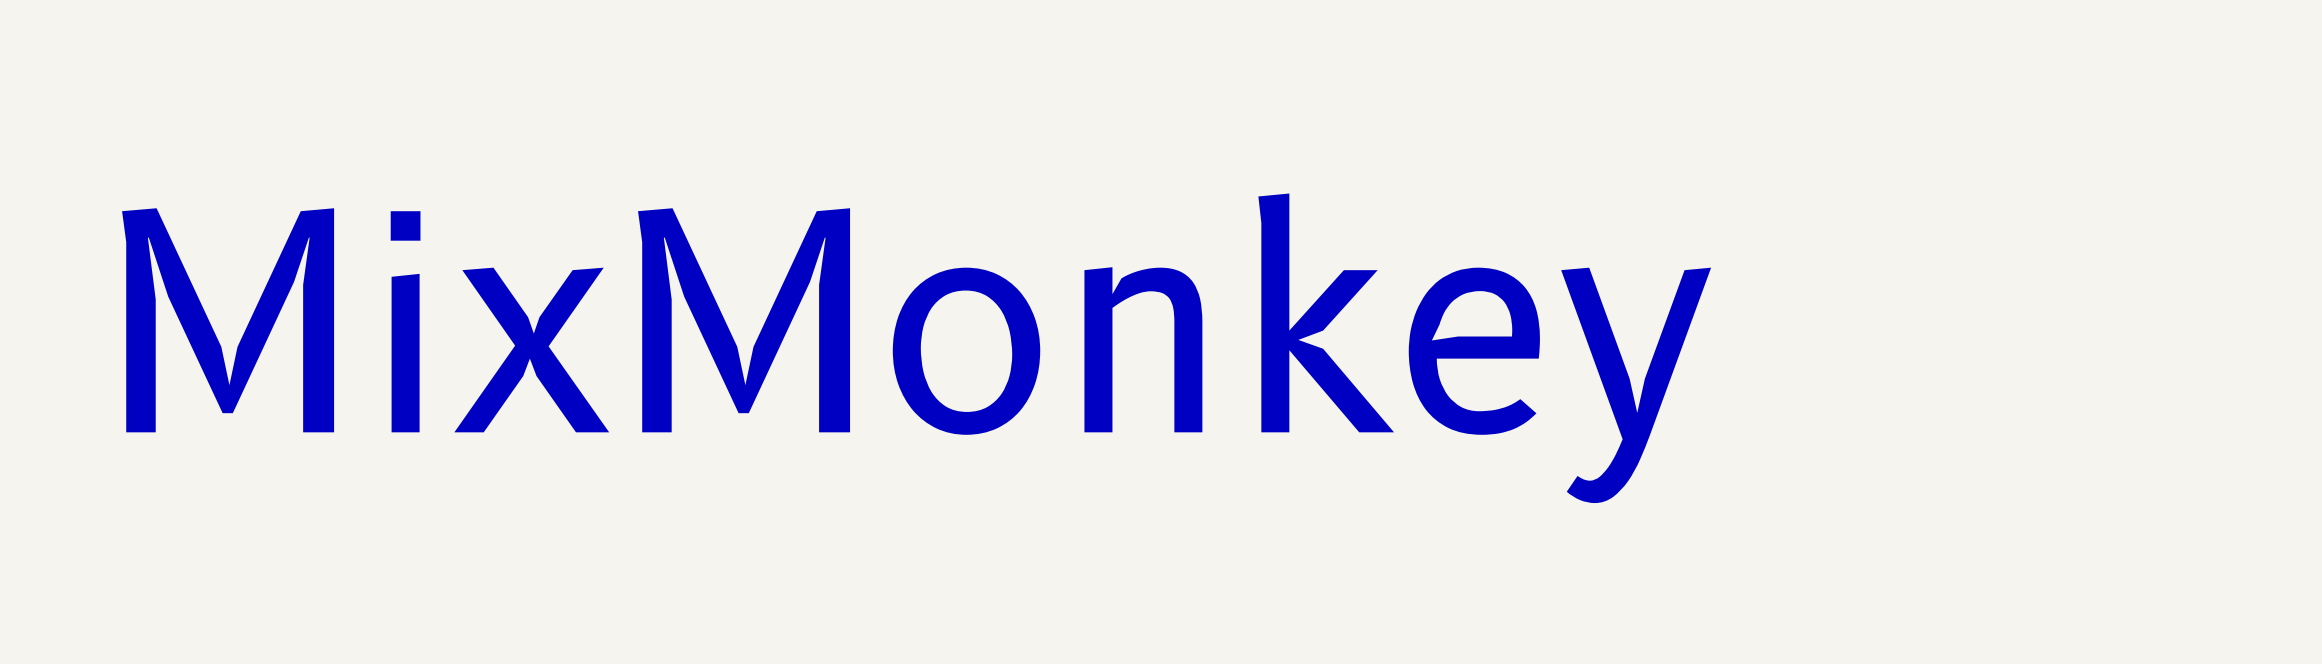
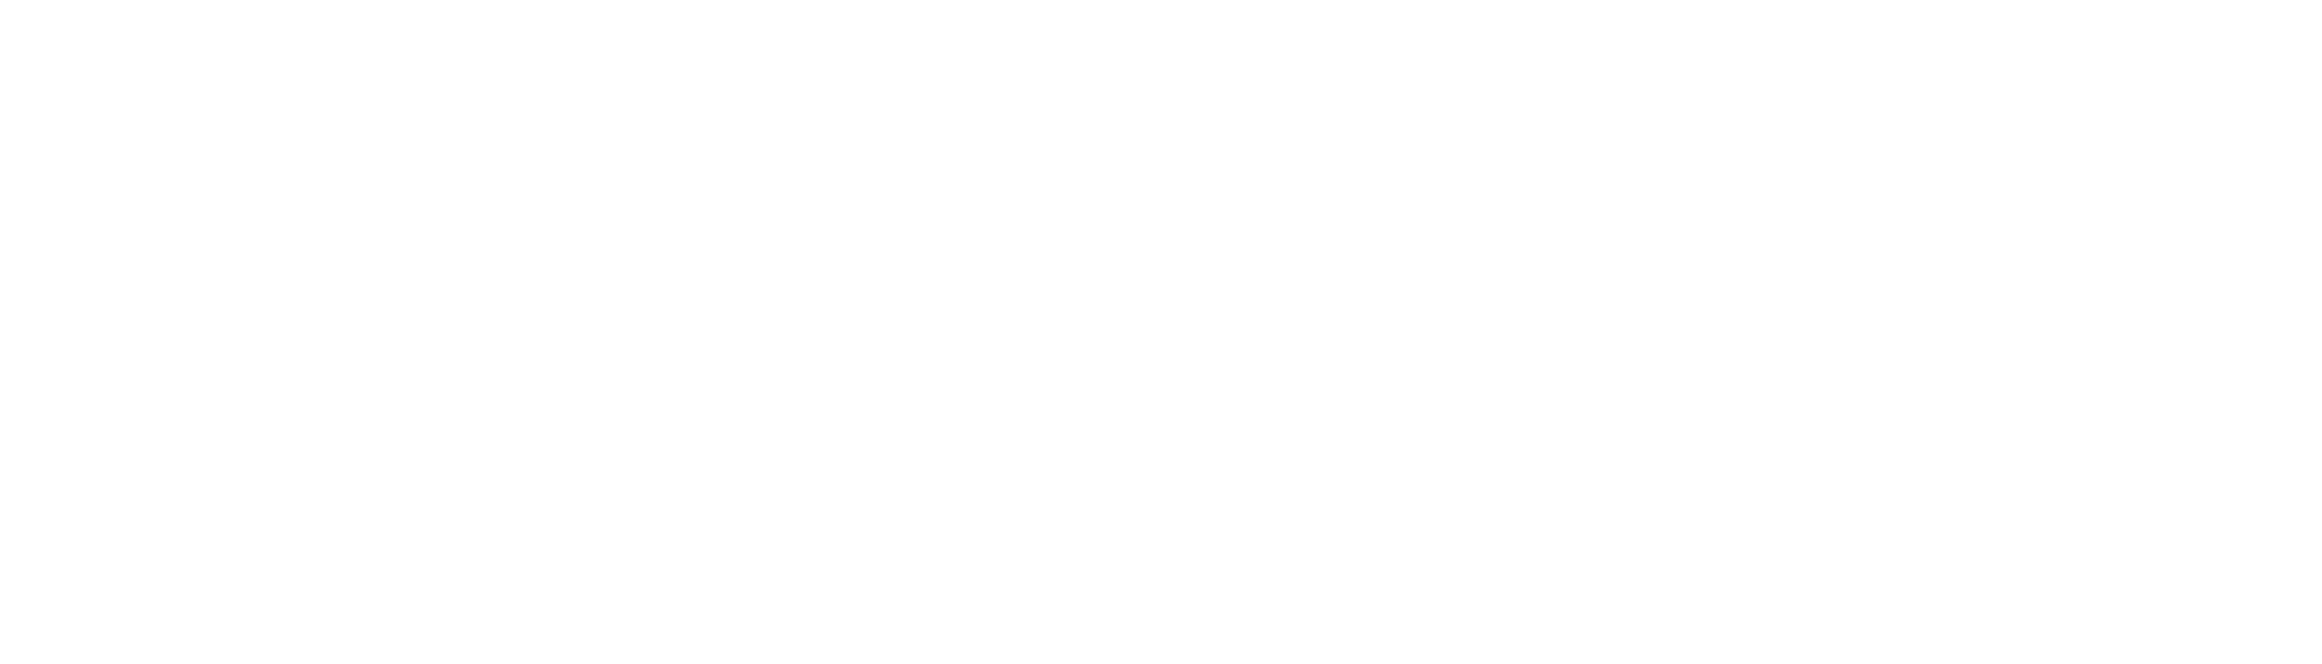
text: MixMonkey (916, 348) -> none

